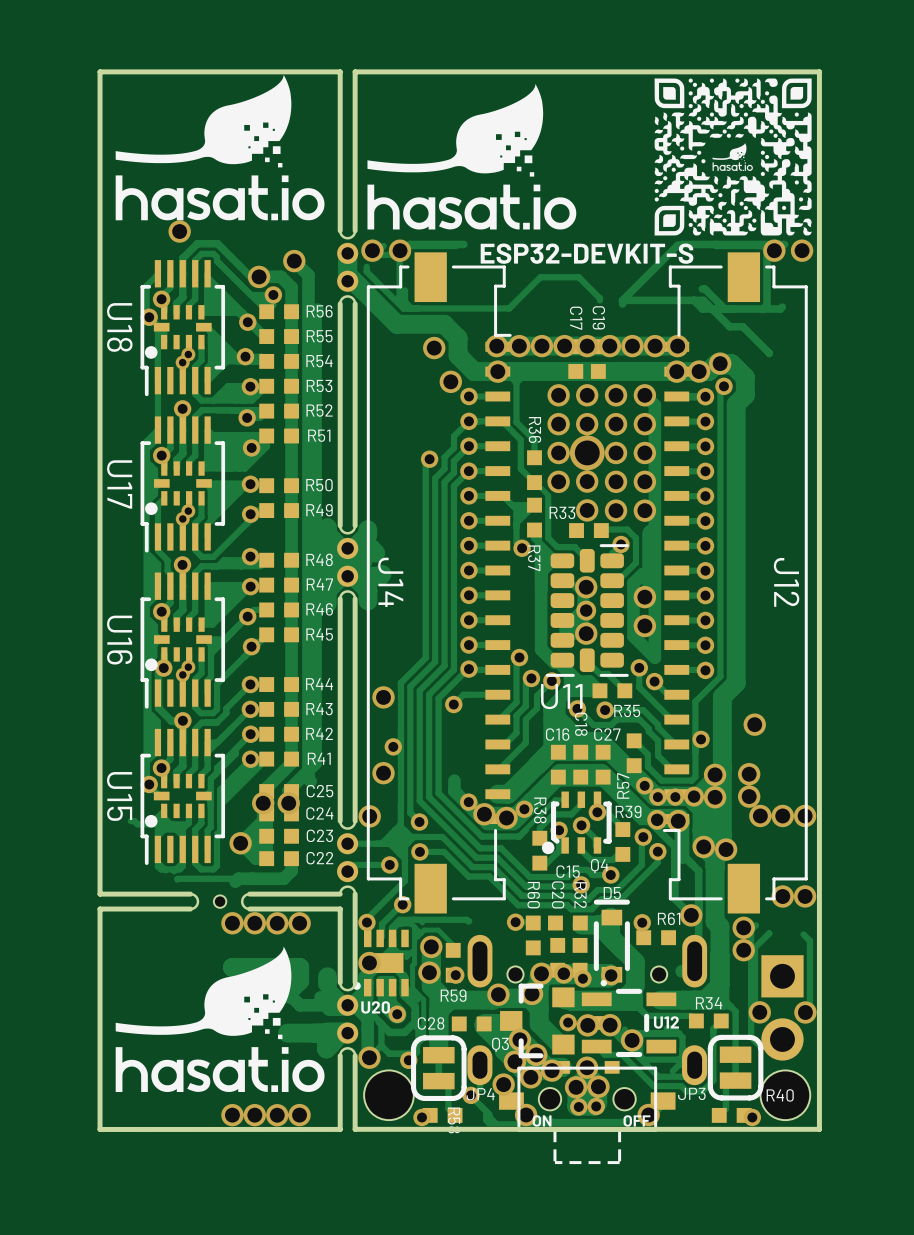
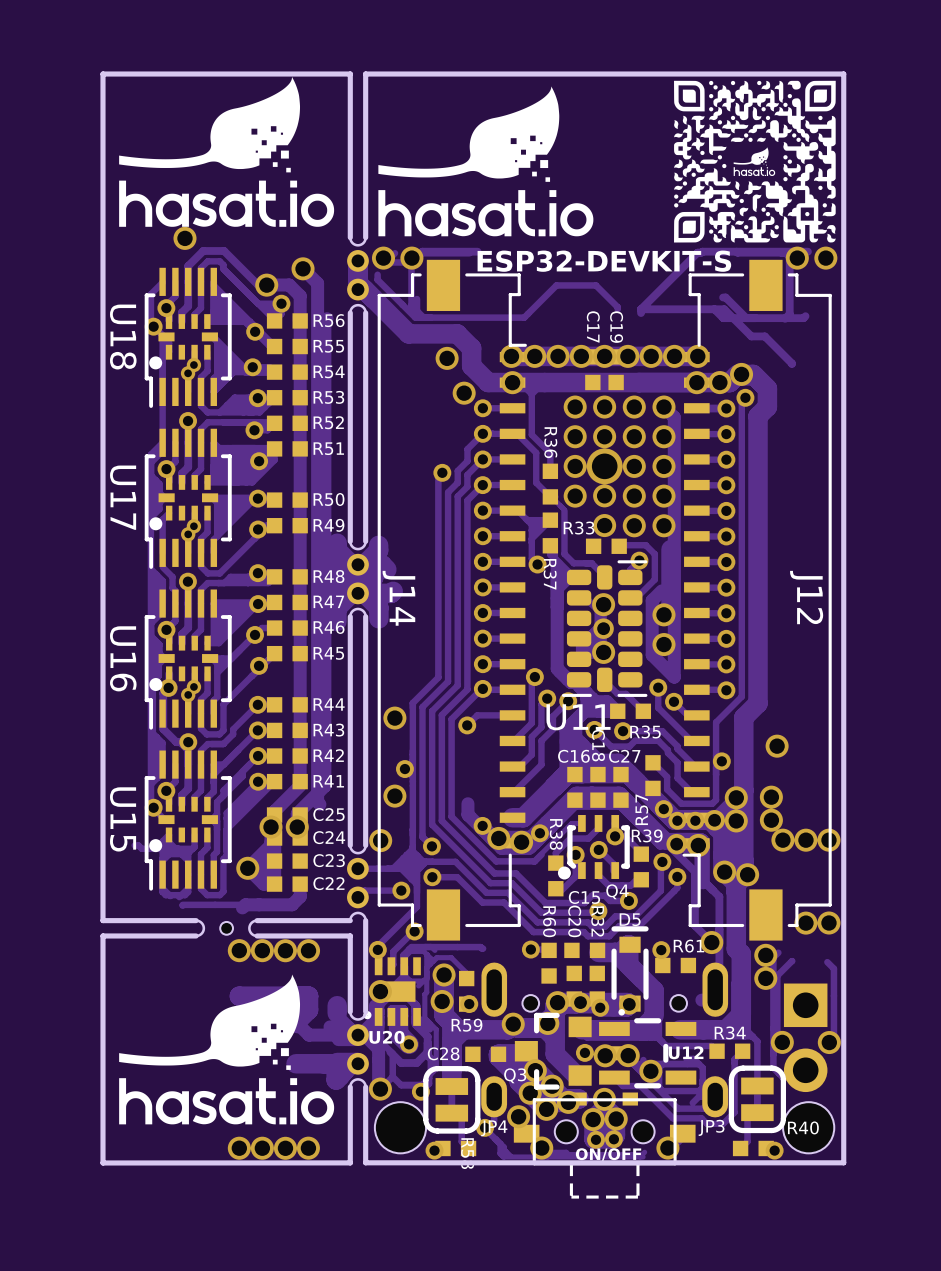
part value: ON OFF (591, 1120) -> ON/OFF (608, 1154)

